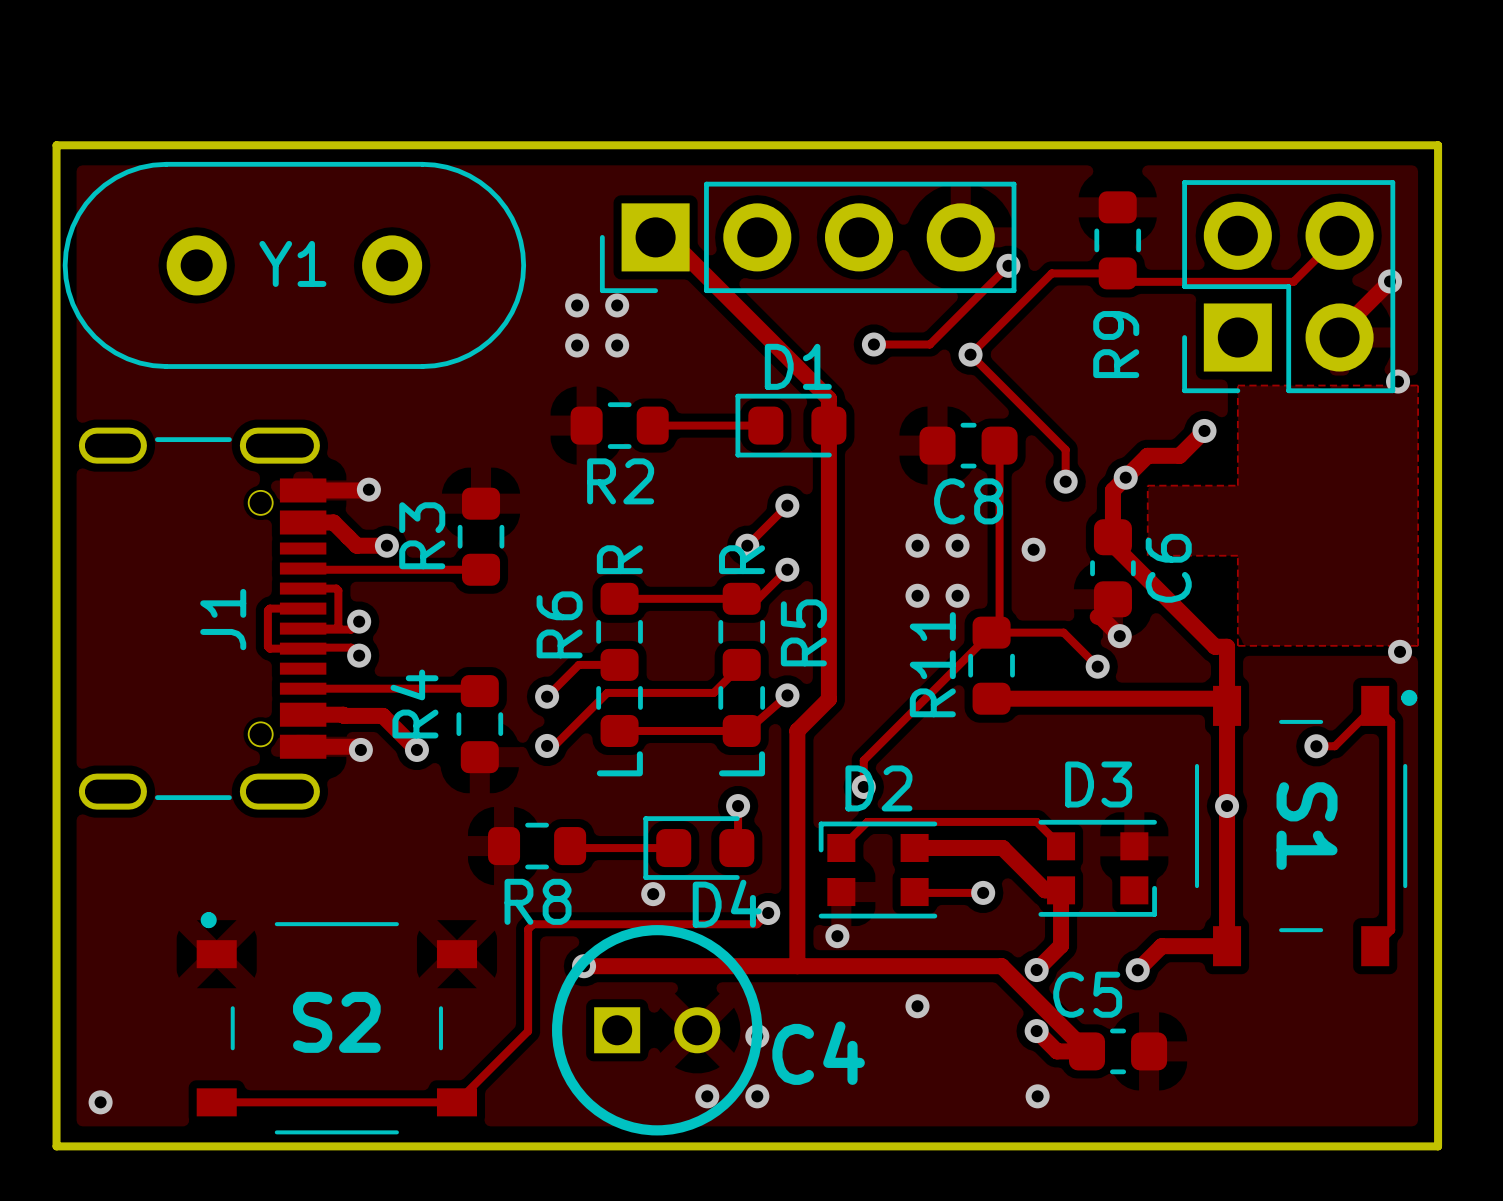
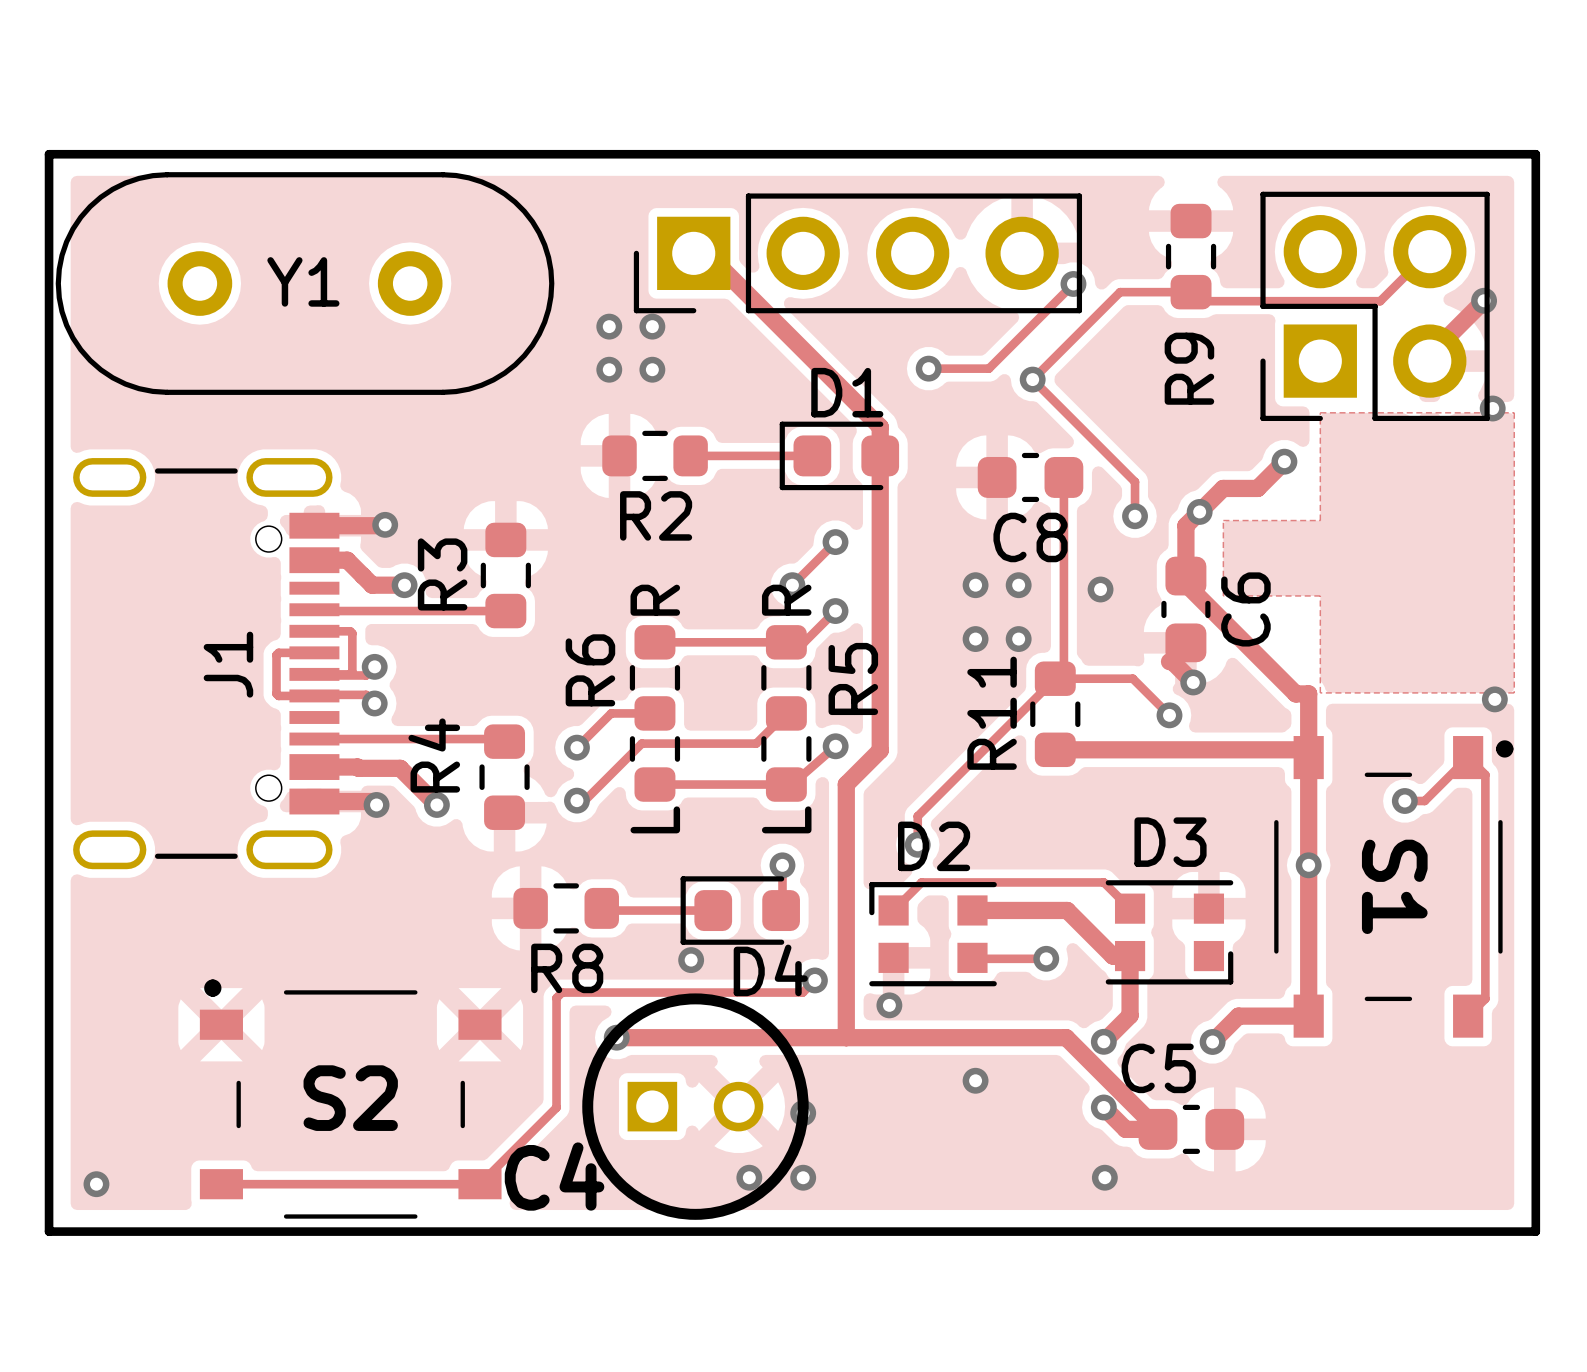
C4 name position: C4 (818, 1053) -> C4 (554, 1176)

